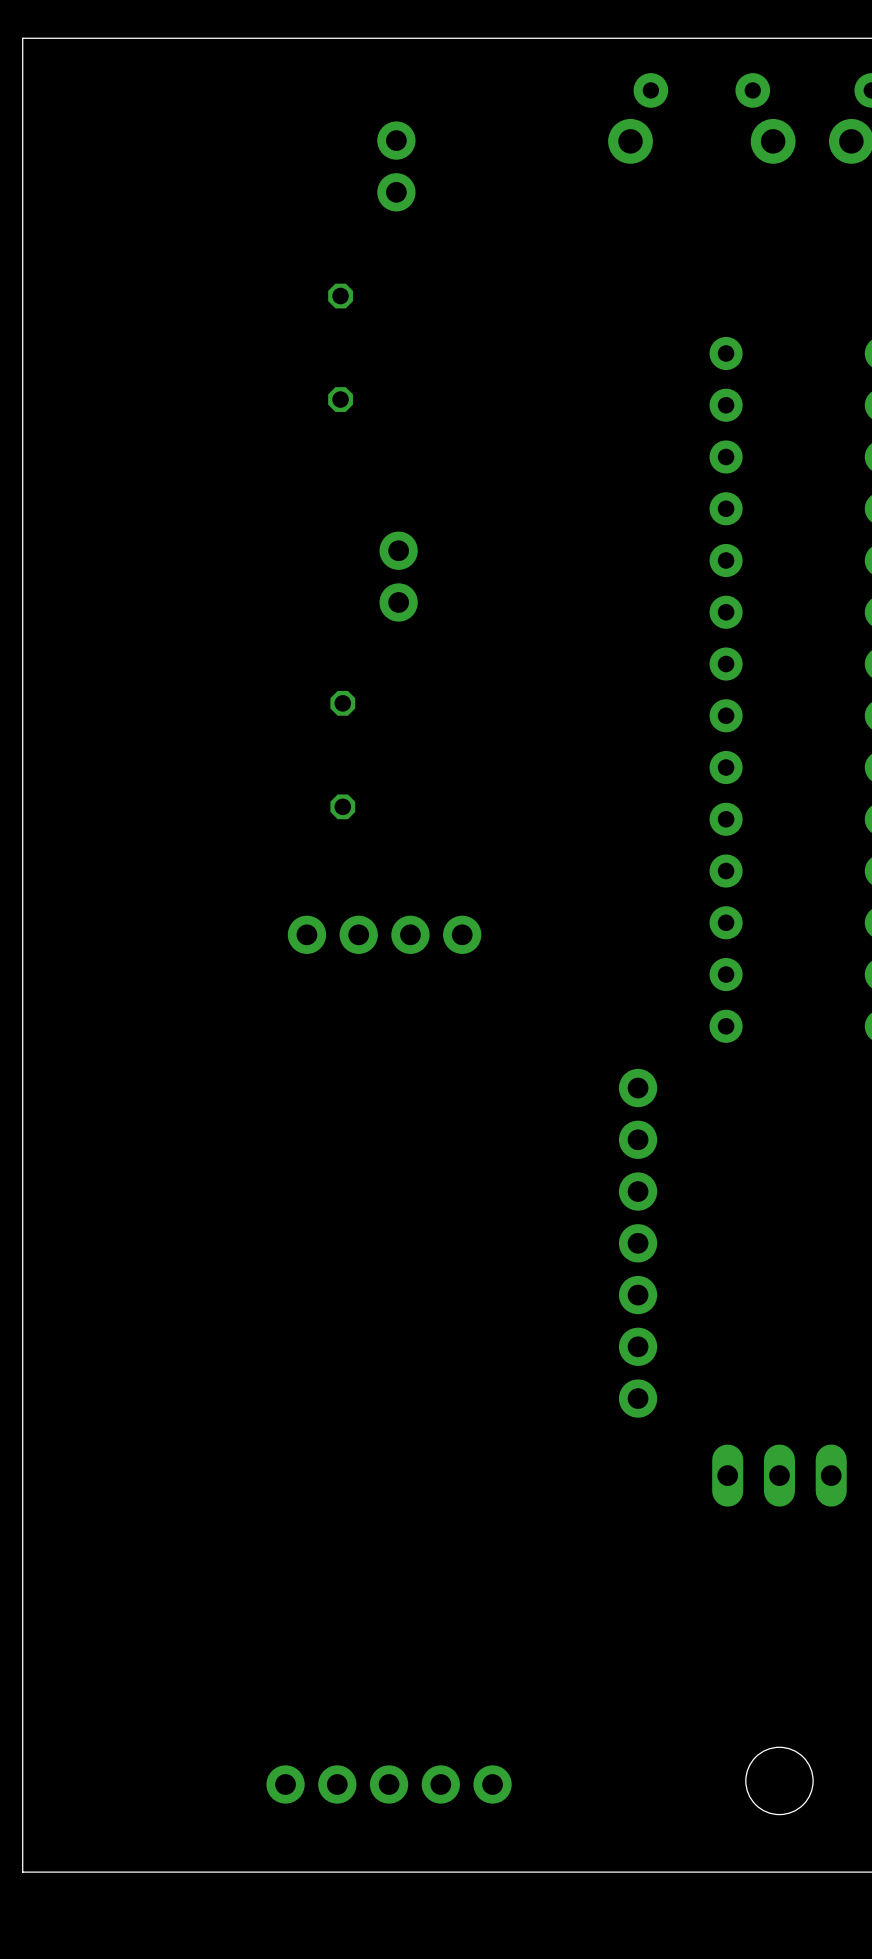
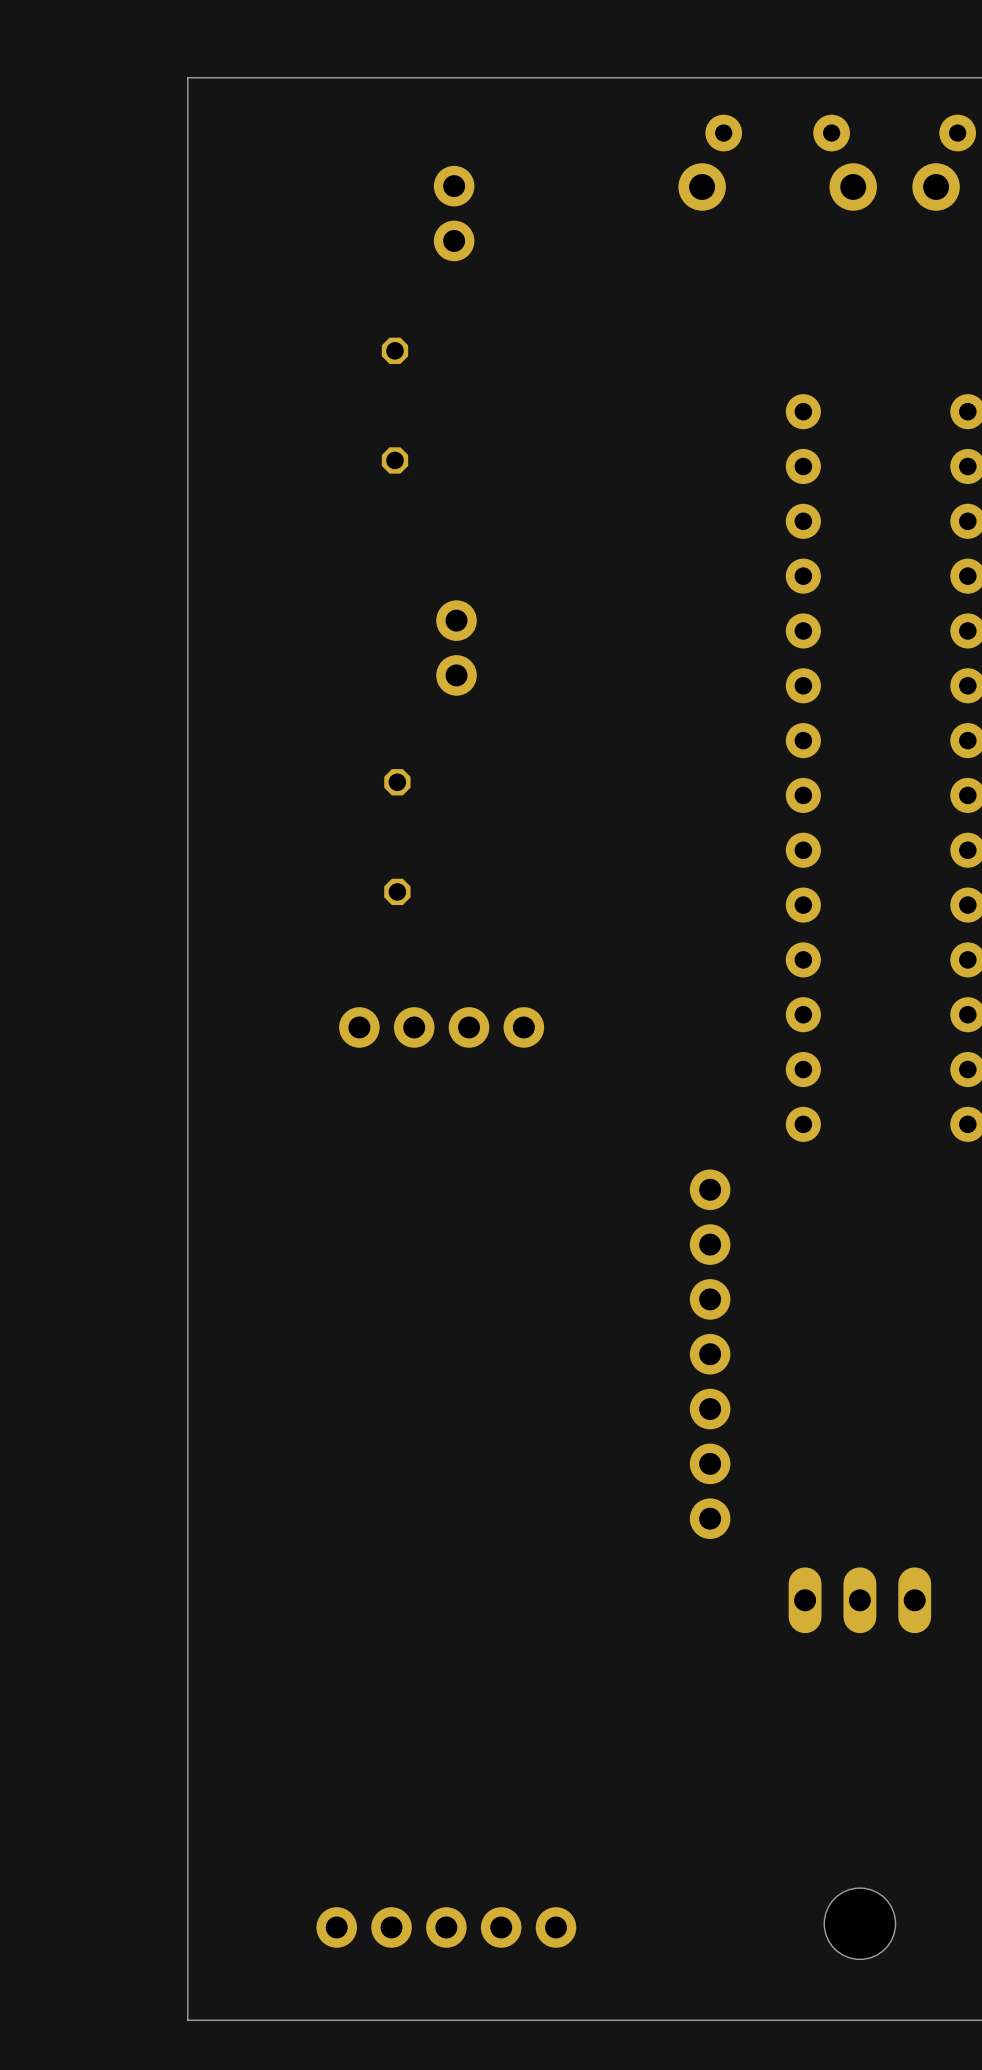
board edge: (144, 38) (22, 38) (22, 1872) (144, 1872) -> (187, 77) (187, 2020)

